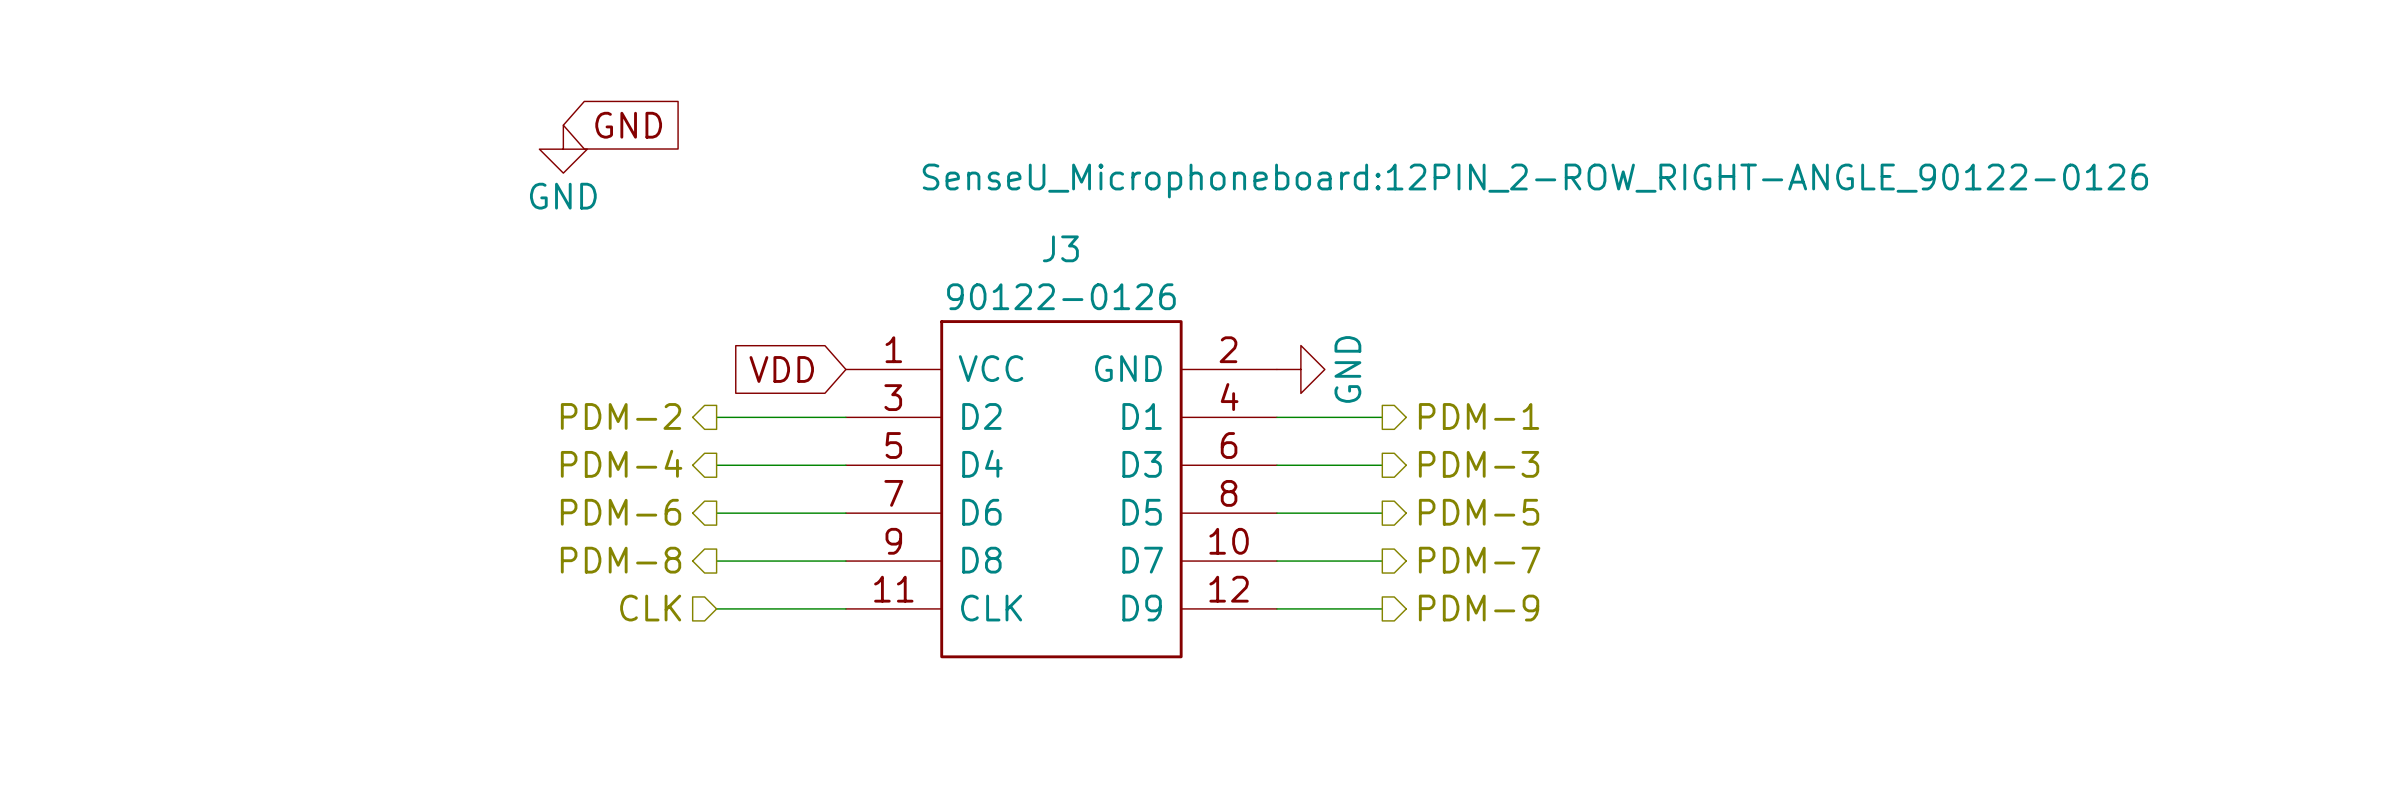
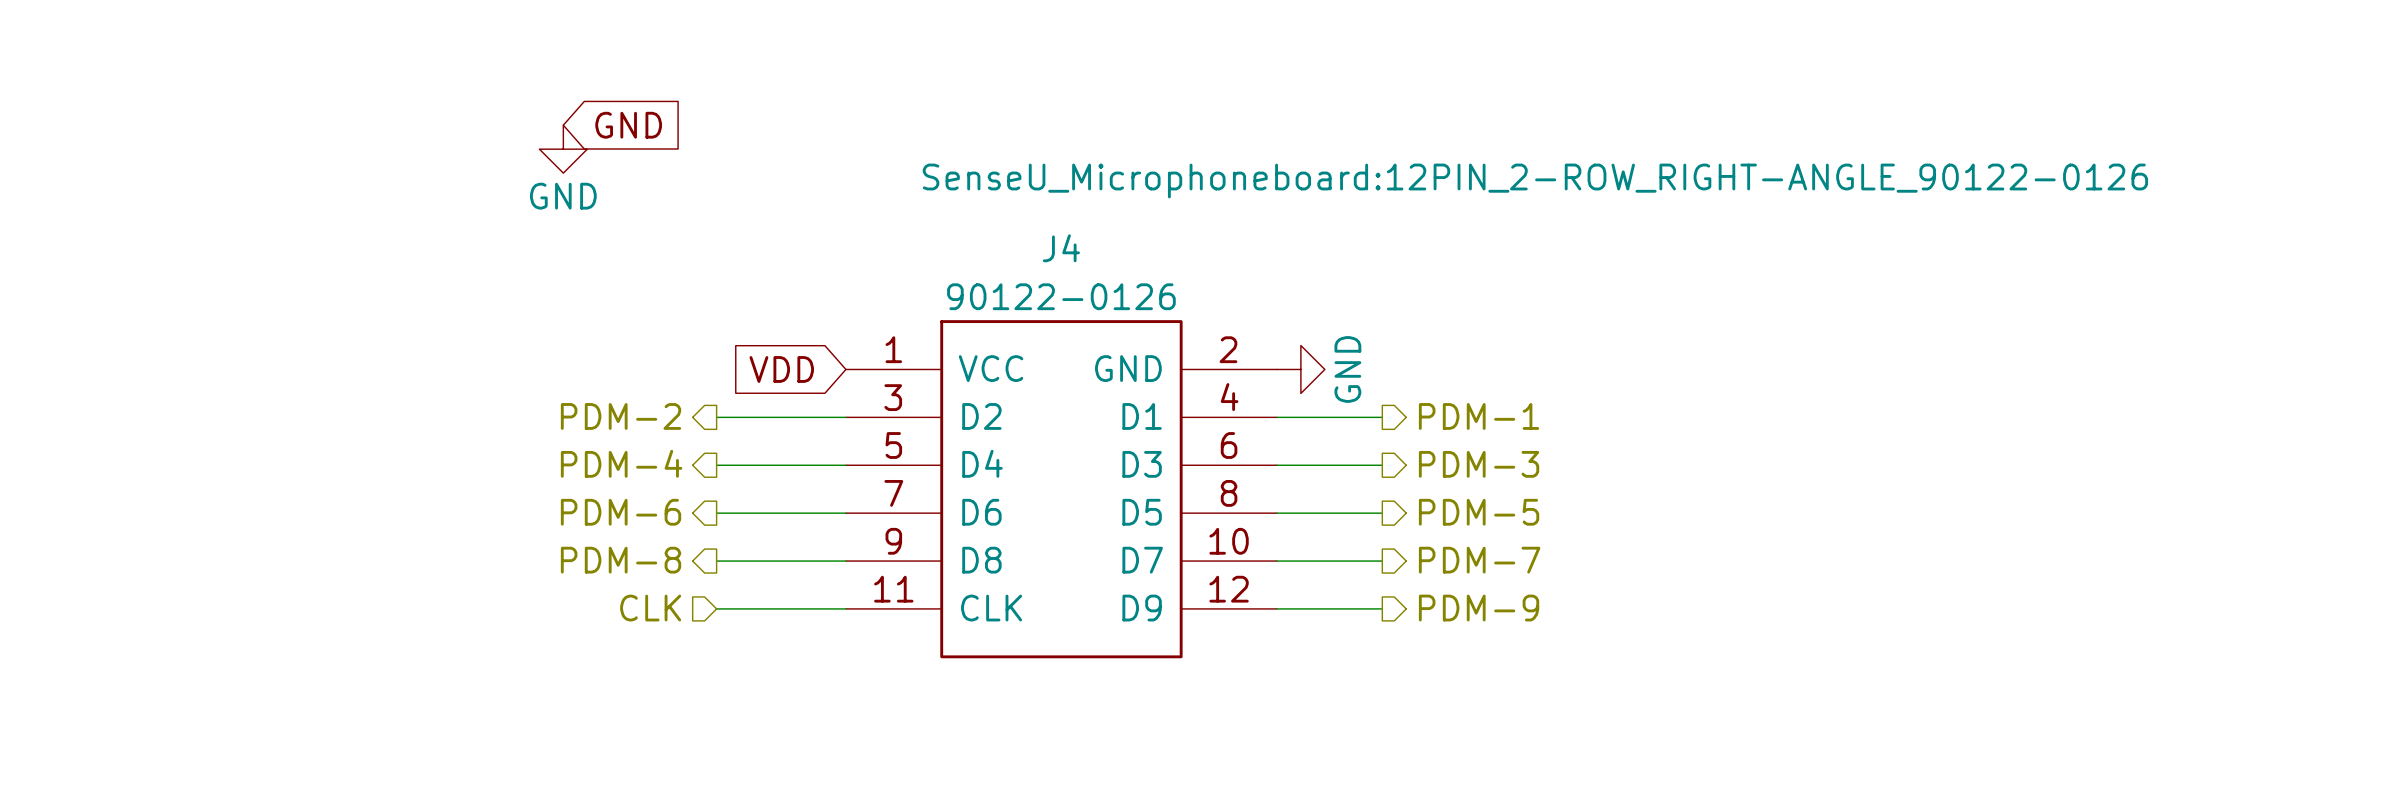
J3 name: J3 (1060, 248) -> J4 (1061, 248)

